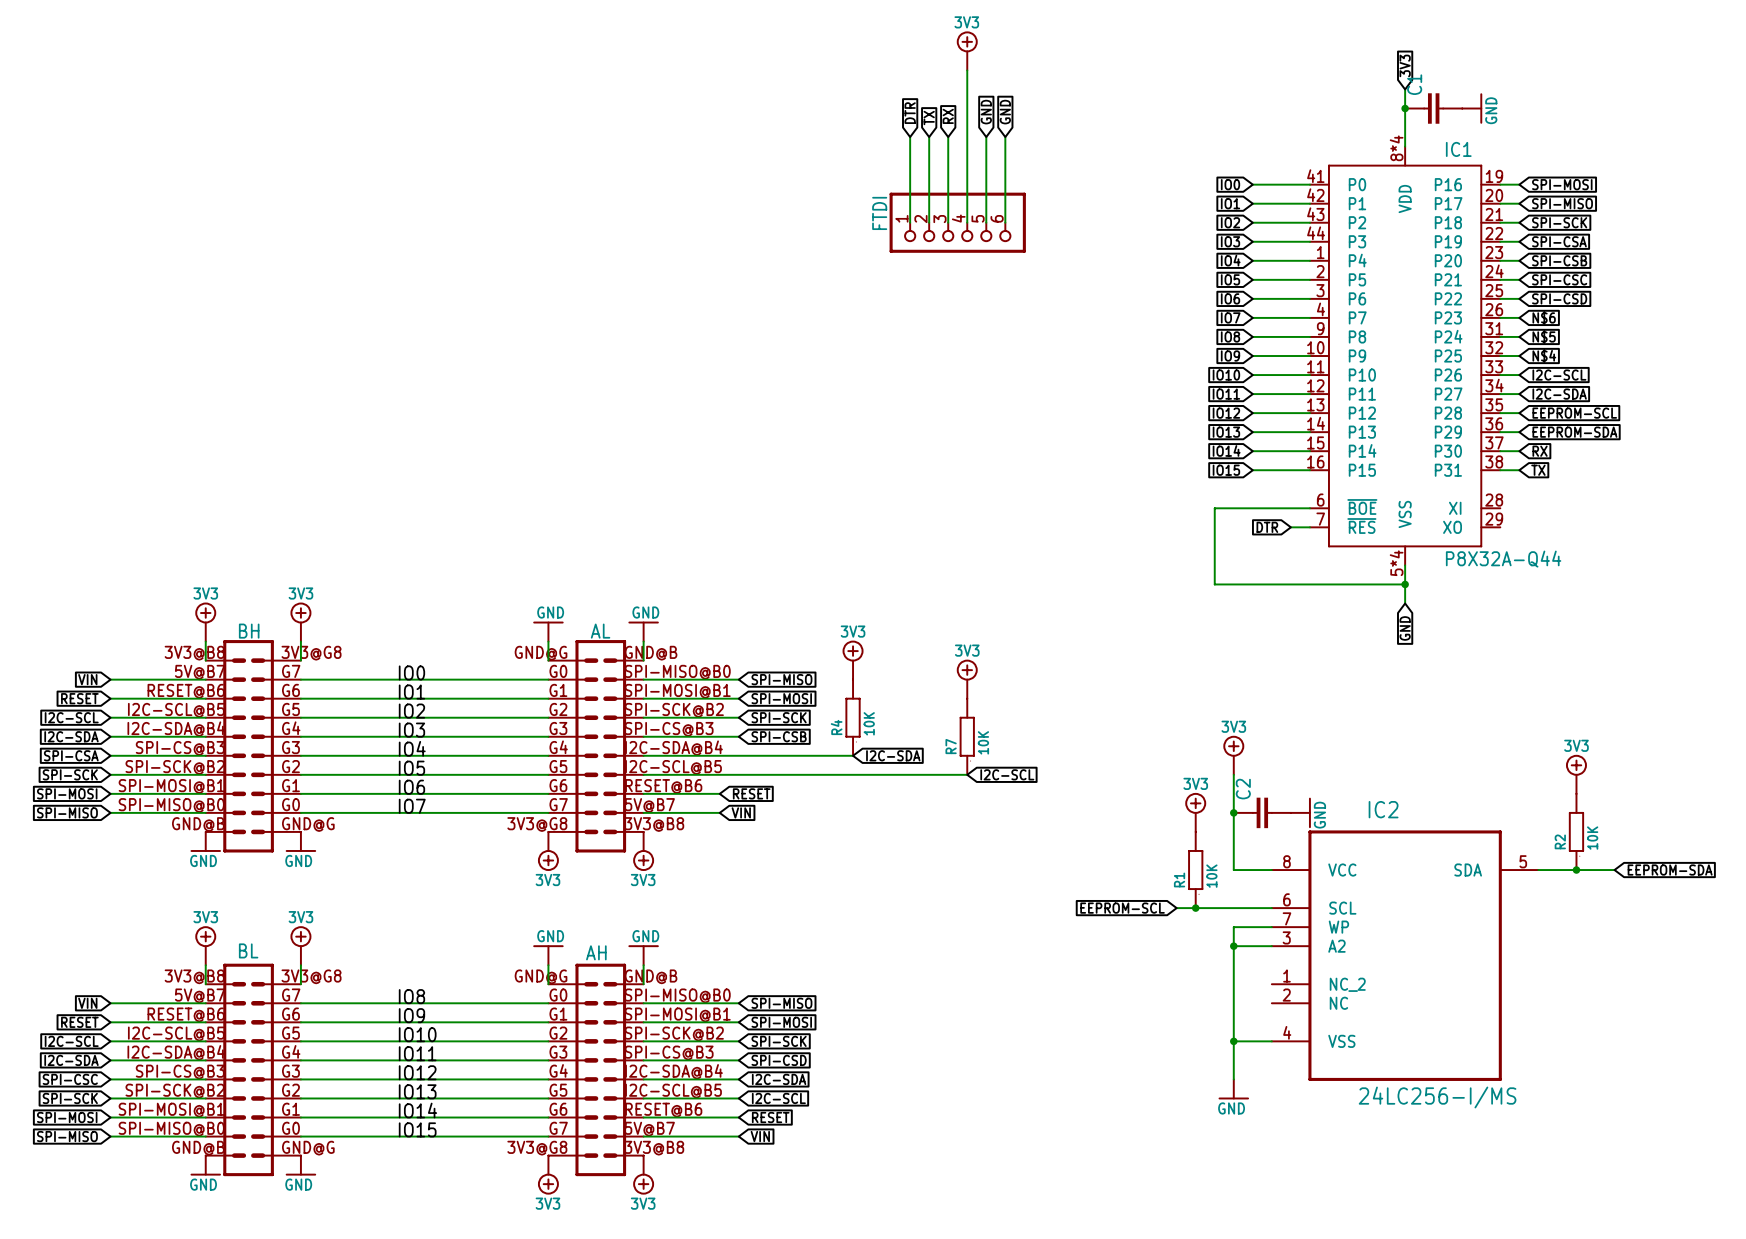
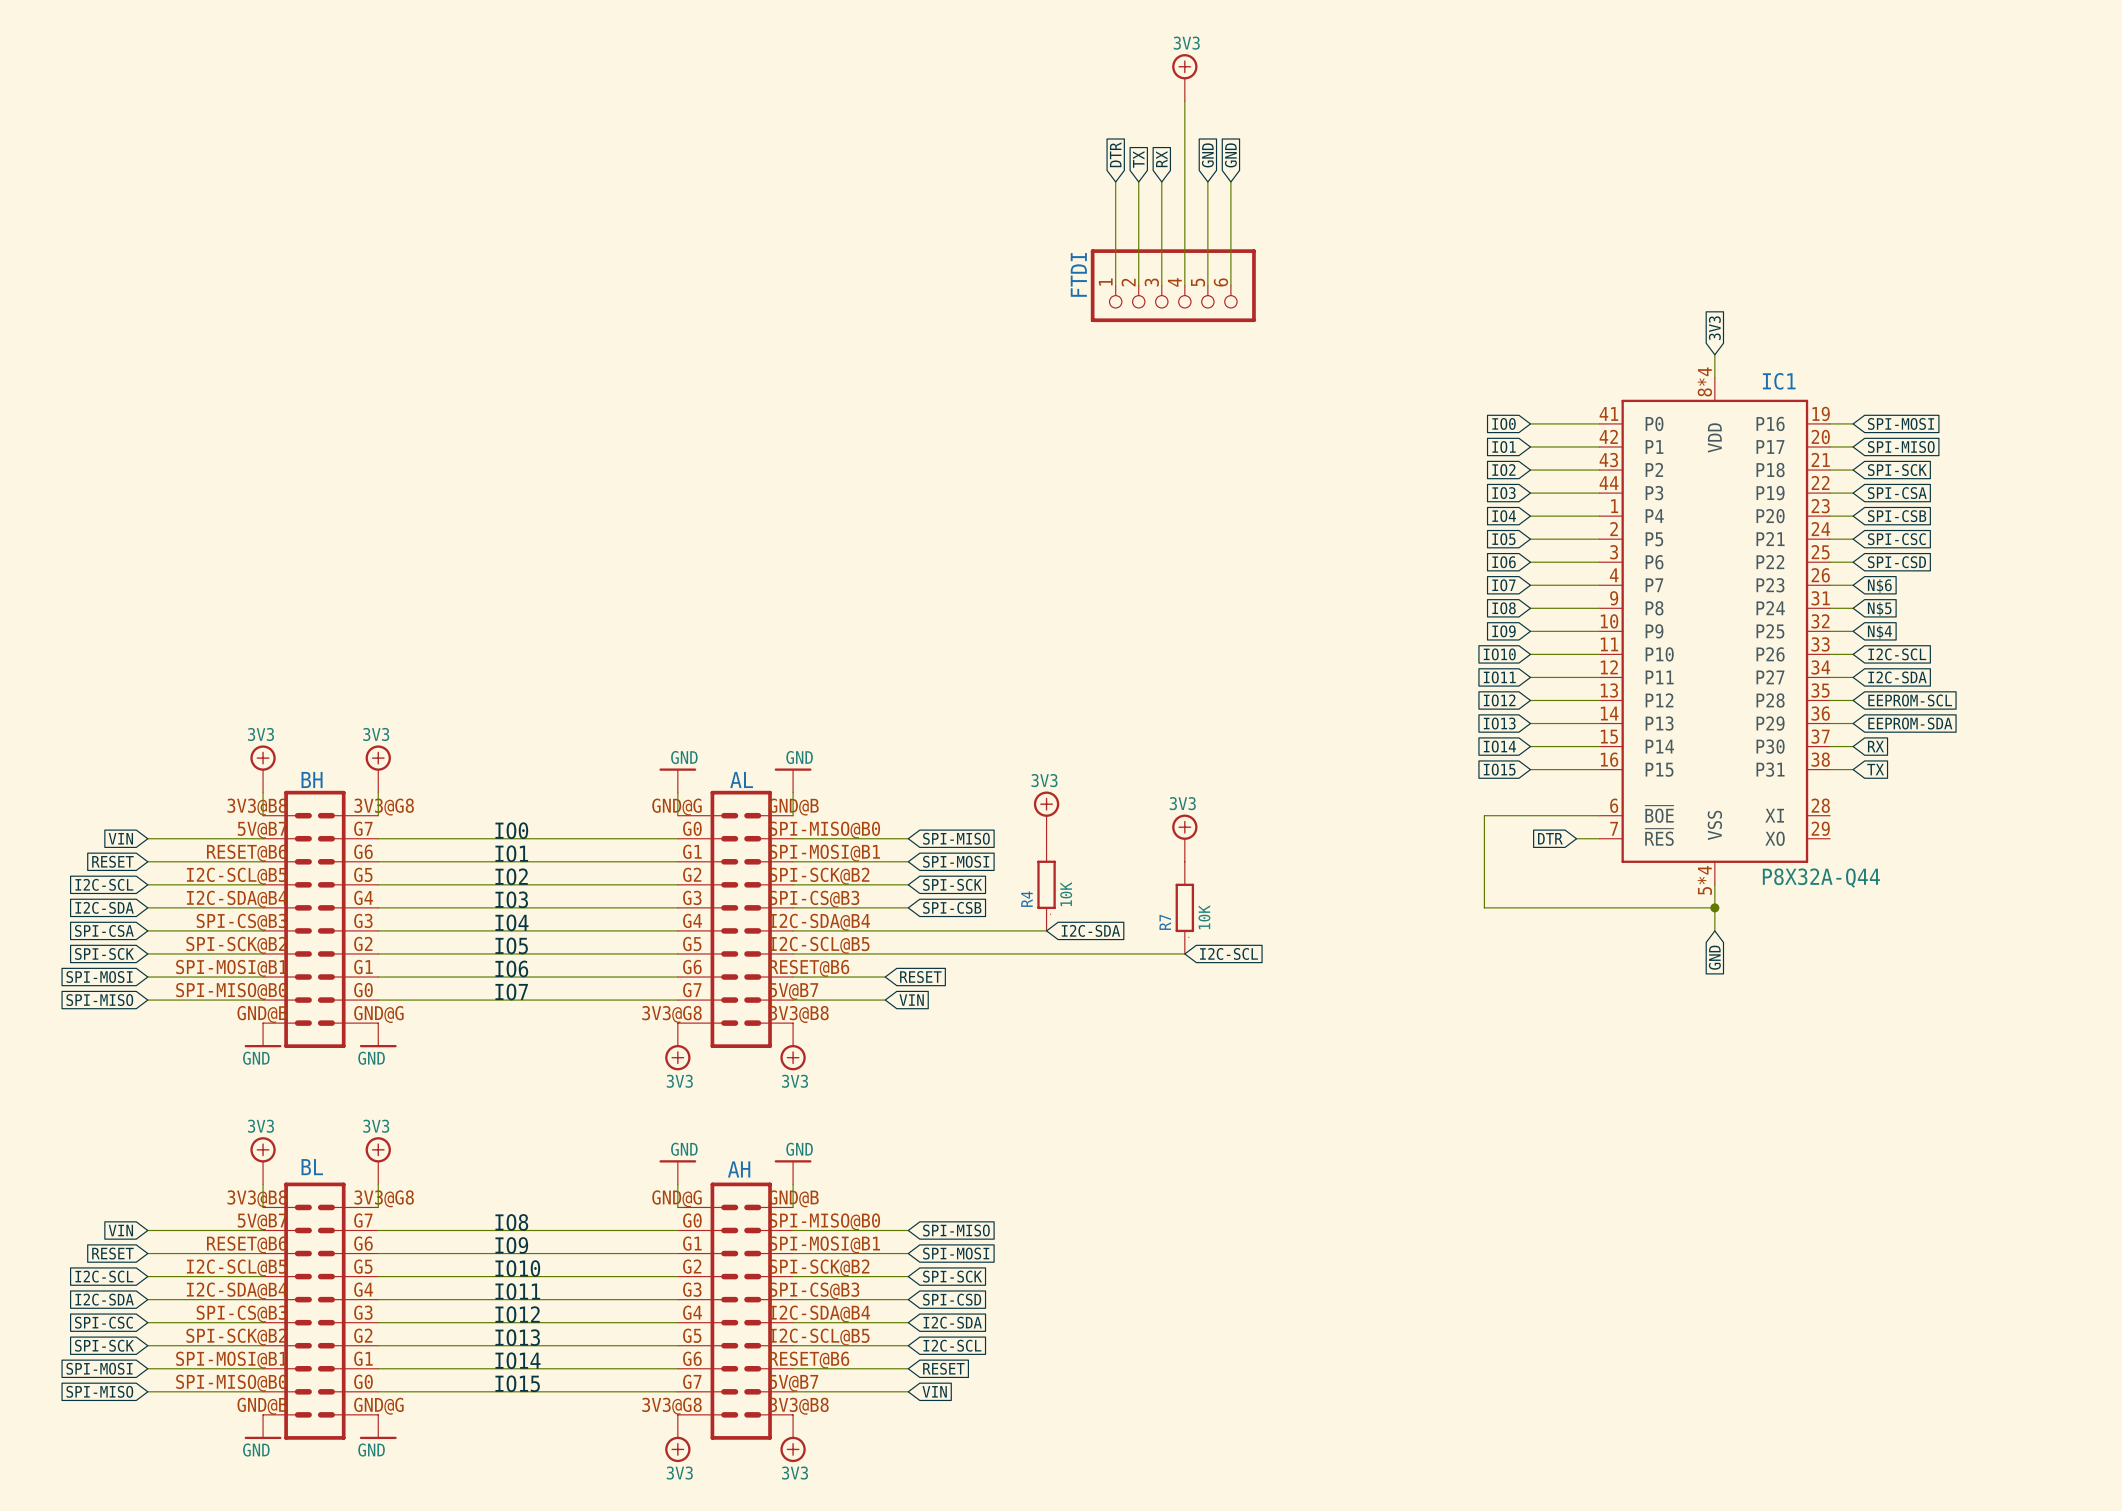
global label: 3V3 (1405, 65) -> none
wire: (1405, 89) (1405, 146) -> none
junction: (1405, 108) -> none
C1: (1433, 108) -> none
power symbol: GND (1472, 108) -> none
global label: IO0 (1230, 184) -> none
wire: (1252, 184) (1309, 184) -> none
wire: (1500, 184) (1519, 184) -> none
global label: SPI-MOSI (1562, 184) -> none
global label: IO1 (1230, 203) -> none
wire: (1252, 203) (1309, 203) -> none
wire: (1500, 203) (1519, 203) -> none
global label: SPI-MISO (1562, 203) -> none
global label: IO2 (1230, 222) -> none
wire: (1252, 222) (1309, 222) -> none
wire: (1500, 222) (1519, 222) -> none
global label: SPI-SCK (1559, 222) -> none
global label: IO3 (1230, 241) -> none
wire: (1252, 241) (1309, 241) -> none
wire: (1500, 241) (1519, 241) -> none
global label: SPI-CSA (1559, 241) -> none
global label: none -> 3V3 (1714, 328)
global label: IO4 (1230, 260) -> none
wire: (1252, 260) (1309, 260) -> none
wire: (1500, 260) (1519, 260) -> none
global label: SPI-CSB (1559, 260) -> none
global label: IO5 (1230, 279) -> none
wire: (1252, 279) (1309, 279) -> none
wire: none -> (1714, 354) (1714, 377)
wire: (1500, 279) (1519, 279) -> none
global label: SPI-CSC (1559, 279) -> none
global label: IO6 (1230, 298) -> none
wire: (1252, 298) (1309, 298) -> none
wire: (1500, 298) (1519, 298) -> none
global label: SPI-CSD (1559, 298) -> none
global label: IO7 (1230, 317) -> none
wire: (1252, 317) (1309, 317) -> (1530, 608) (1599, 608)
wire: (1500, 317) (1519, 317) -> (1830, 608) (1853, 608)
global label: N$6 (1544, 317) -> none
global label: IO8 (1230, 336) -> IO0 (1504, 423)
global label: N$5 (1544, 336) -> SPI-MOSI (1900, 423)
global label: IO9 (1230, 356) -> IO1 (1504, 447)
IC1 position: (1405, 356) -> (1714, 631)
global label: N$4 (1544, 356) -> SPI-MISO (1901, 447)
global label: IO10 (1226, 375) -> IO2 (1503, 470)
global label: I2C-SCL (1559, 375) -> SPI-SCK (1897, 470)
global label: IO11 (1226, 394) -> IO3 (1503, 493)
global label: I2C-SDA (1559, 394) -> SPI-CSA (1897, 493)
global label: IO12 (1226, 413) -> IO4 (1504, 516)
global label: EEPROM-SCL (1574, 413) -> SPI-CSB (1897, 516)
global label: IO13 (1226, 432) -> IO5 (1503, 539)
global label: EEPROM-SDA (1574, 432) -> SPI-CSC (1896, 539)
global label: IO14 (1226, 450) -> IO6 (1504, 562)
global label: RX (1540, 451) -> SPI-CSD (1896, 562)
global label: IO15 (1226, 470) -> IO7 (1503, 585)
global label: TX (1538, 470) -> N$6 (1879, 586)
global label: none -> IO8 (1504, 608)
global label: none -> N$5 (1879, 609)
global label: none -> IO9 (1504, 631)
wire: (1252, 508) (1214, 508) (1214, 584) (1252, 584) -> none
wire: none -> (1830, 631) (1853, 631)
global label: none -> N$4 (1879, 632)
global label: none -> IO10 (1499, 654)
wire: none -> (1530, 654) (1576, 654)
global label position: DTR (1267, 527) -> DTR (1550, 838)
wire: none -> (1830, 654) (1853, 654)
global label: none -> I2C-SCL (1897, 654)
global label: none -> IO11 (1499, 677)
wire: none -> (1530, 677) (1599, 677)
wire: none -> (1830, 677) (1853, 677)
global label: none -> I2C-SDA (1897, 677)
global label: none -> IO12 (1499, 700)
wire: none -> (1530, 700) (1599, 700)
wire: (1405, 565) (1405, 603) -> (1714, 884) (1714, 930)
wire: none -> (1830, 700) (1853, 700)
global label: none -> EEPROM-SCL (1910, 700)
global label: none -> IO13 (1499, 723)
wire: (1309, 584) (1405, 584) -> none
junction: (1405, 584) -> none
wire: none -> (1830, 723) (1853, 723)
global label: none -> EEPROM-SDA (1910, 723)
global label: none -> IO14 (1499, 746)
wire: none -> (1530, 746) (1599, 746)
wire: none -> (1830, 746) (1853, 746)
global label: none -> RX (1875, 746)
global label: none -> IO15 (1499, 769)
wire: none -> (1530, 769) (1599, 769)
wire: none -> (1830, 769) (1853, 769)
global label: none -> TX (1875, 769)
global label position: GND (1405, 628) -> GND (1714, 957)
wire: none -> (1599, 815) (1484, 815) (1484, 907) (1714, 907)
wire: none -> (1576, 838) (1599, 838)
junction: none -> (1714, 907)
power symbol: 3V3 (1233, 755) -> none
wire: (1233, 774) (1233, 870) (1271, 870) -> none
power symbol: 3V3 (1576, 774) -> none
power symbol: 3V3 (1195, 812) -> none
junction: (1233, 812) -> none
C2: (1262, 812) -> none
power symbol: GND (1300, 812) -> none
R2: 10K (1576, 831) -> none
R1: 10K (1195, 870) -> none
wire: (1538, 870) (1614, 870) -> none
junction: (1576, 870) -> none
global label: EEPROM-SDA (1670, 870) -> none
global label: EEPROM-SCL (1122, 908) -> none
wire: (1176, 908) (1271, 908) -> none
junction: (1195, 908) -> none
wire: (1271, 927) (1233, 927) (1233, 1079) -> none
wire: (1233, 946) (1271, 946) -> none
junction: (1233, 946) -> none
IC2: 24LC256-I/MS (1405, 955) -> none
wire: (1233, 1041) (1271, 1041) -> none
junction: (1233, 1041) -> none
power symbol: GND (1233, 1089) -> none

